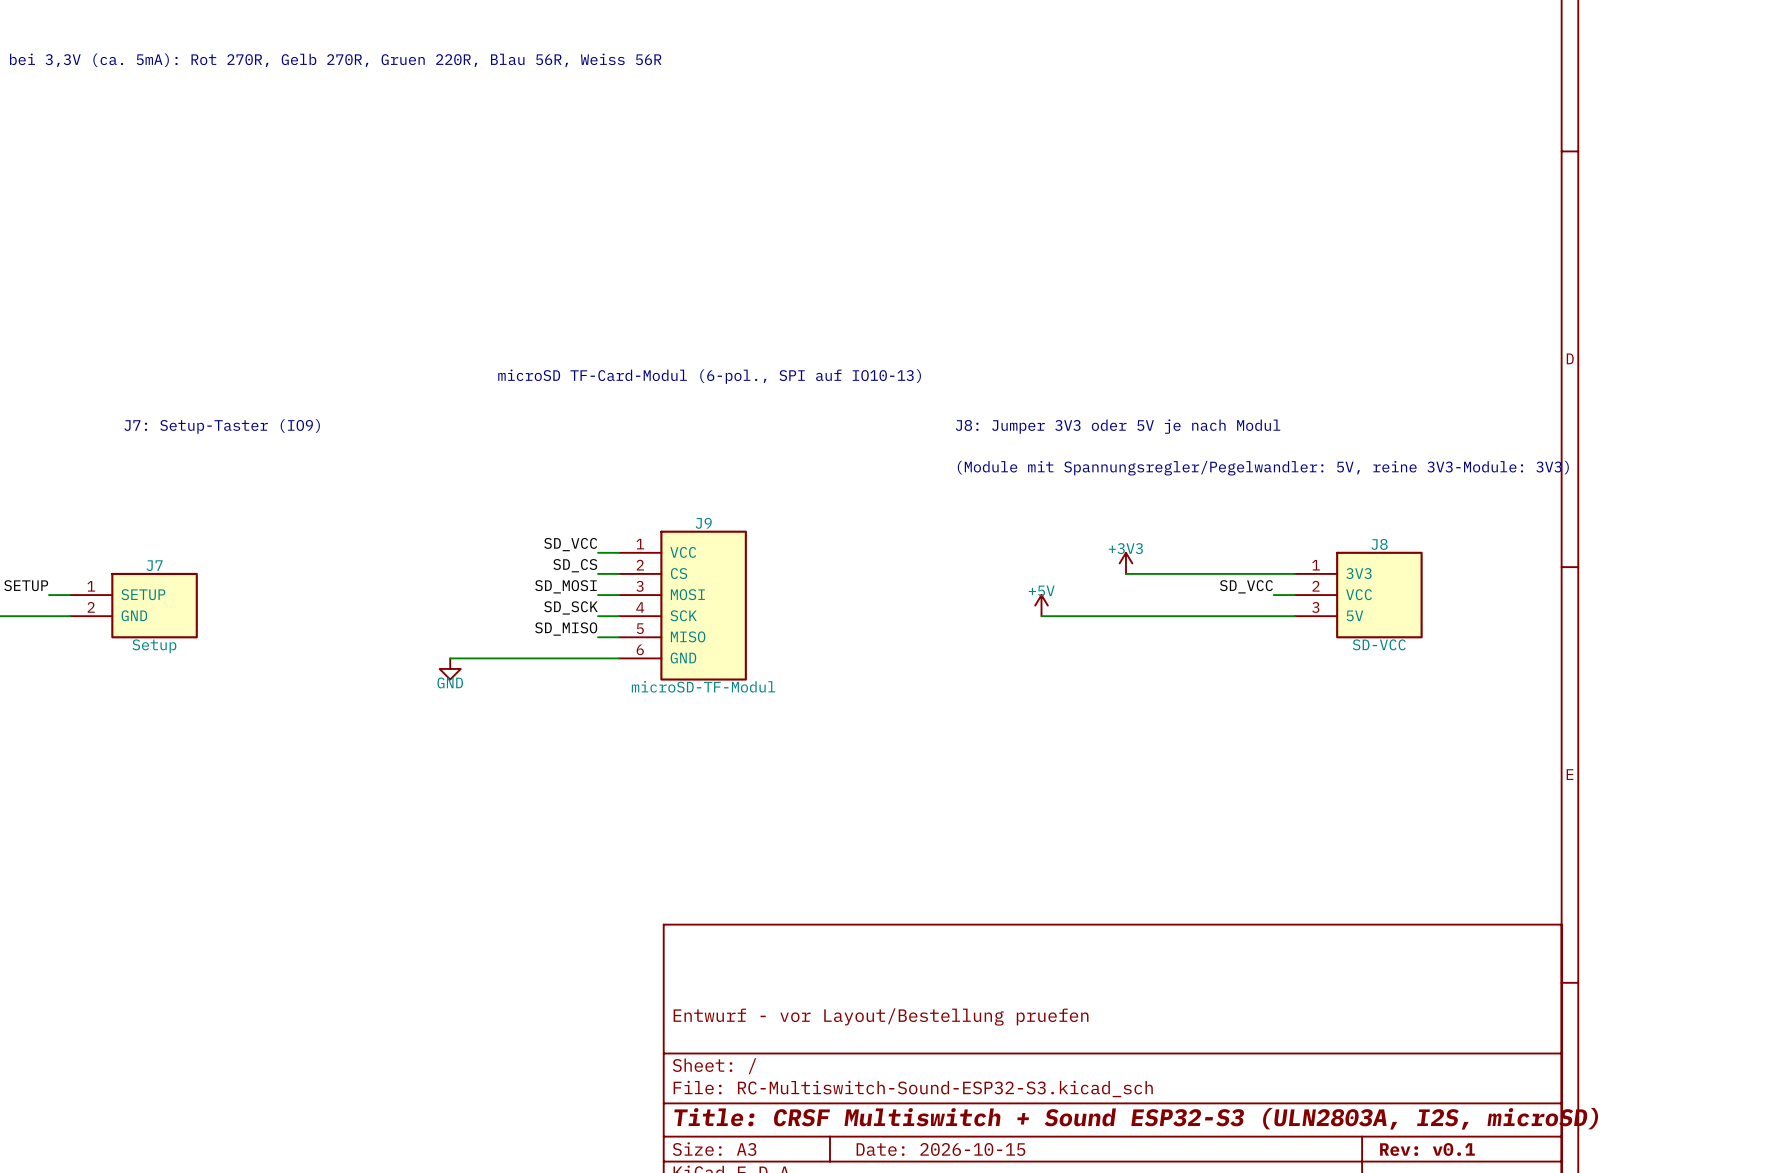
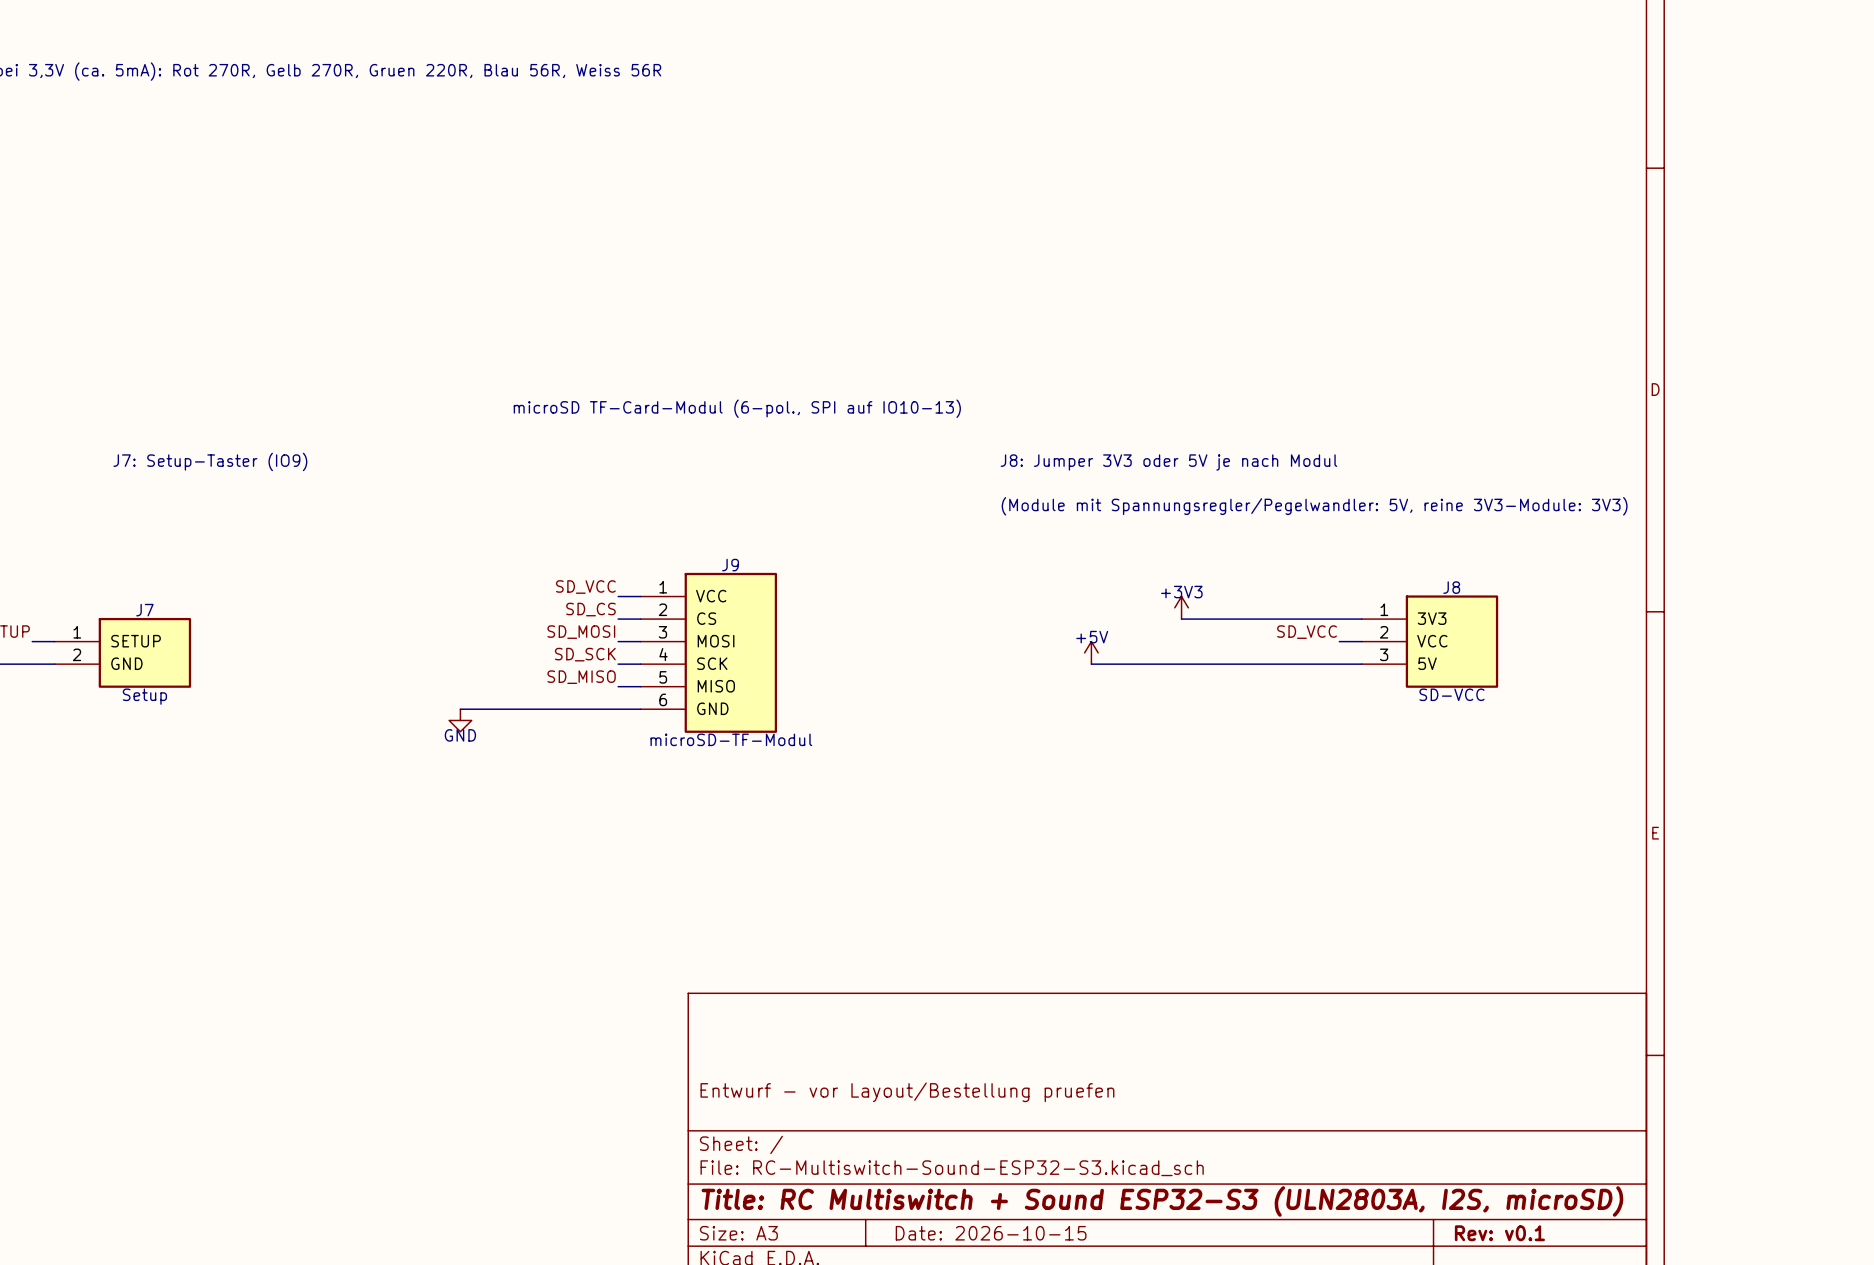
title block: Title: CRSF Multiswitch + Sound ESP32-S3 (ULN2803A, I2S, microSD) (1136, 1118) -> Title: RC Multiswitch + Sound ESP32-S3 (ULN2803A, I2S, microSD) (1162, 1201)

